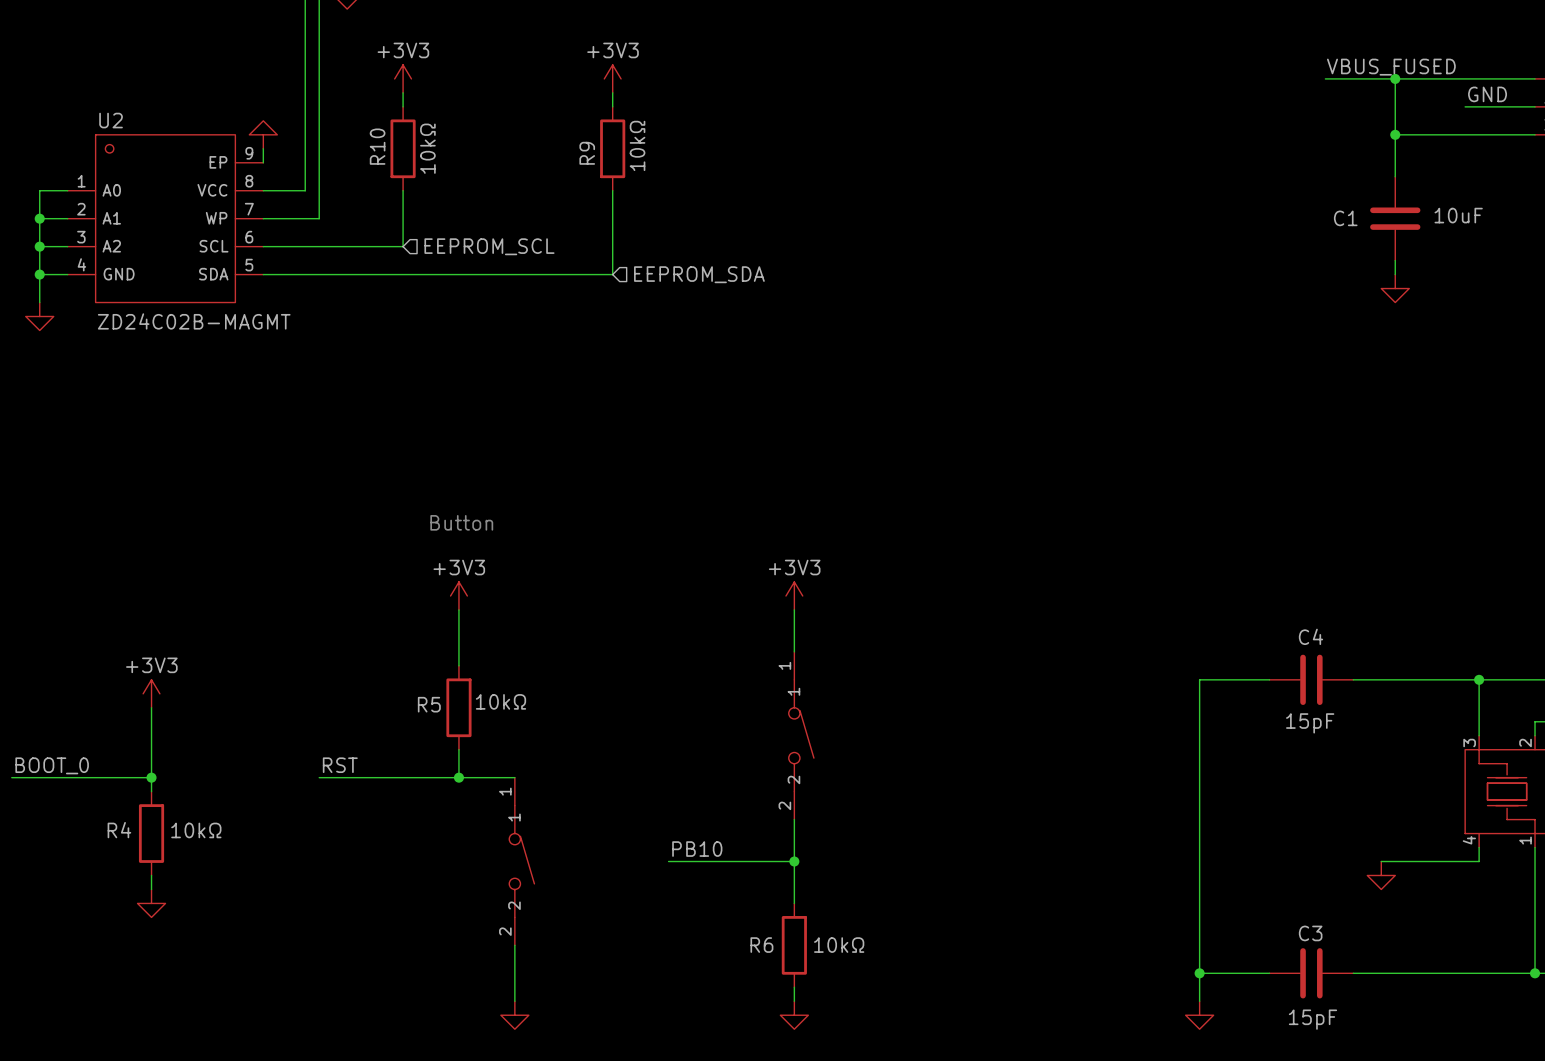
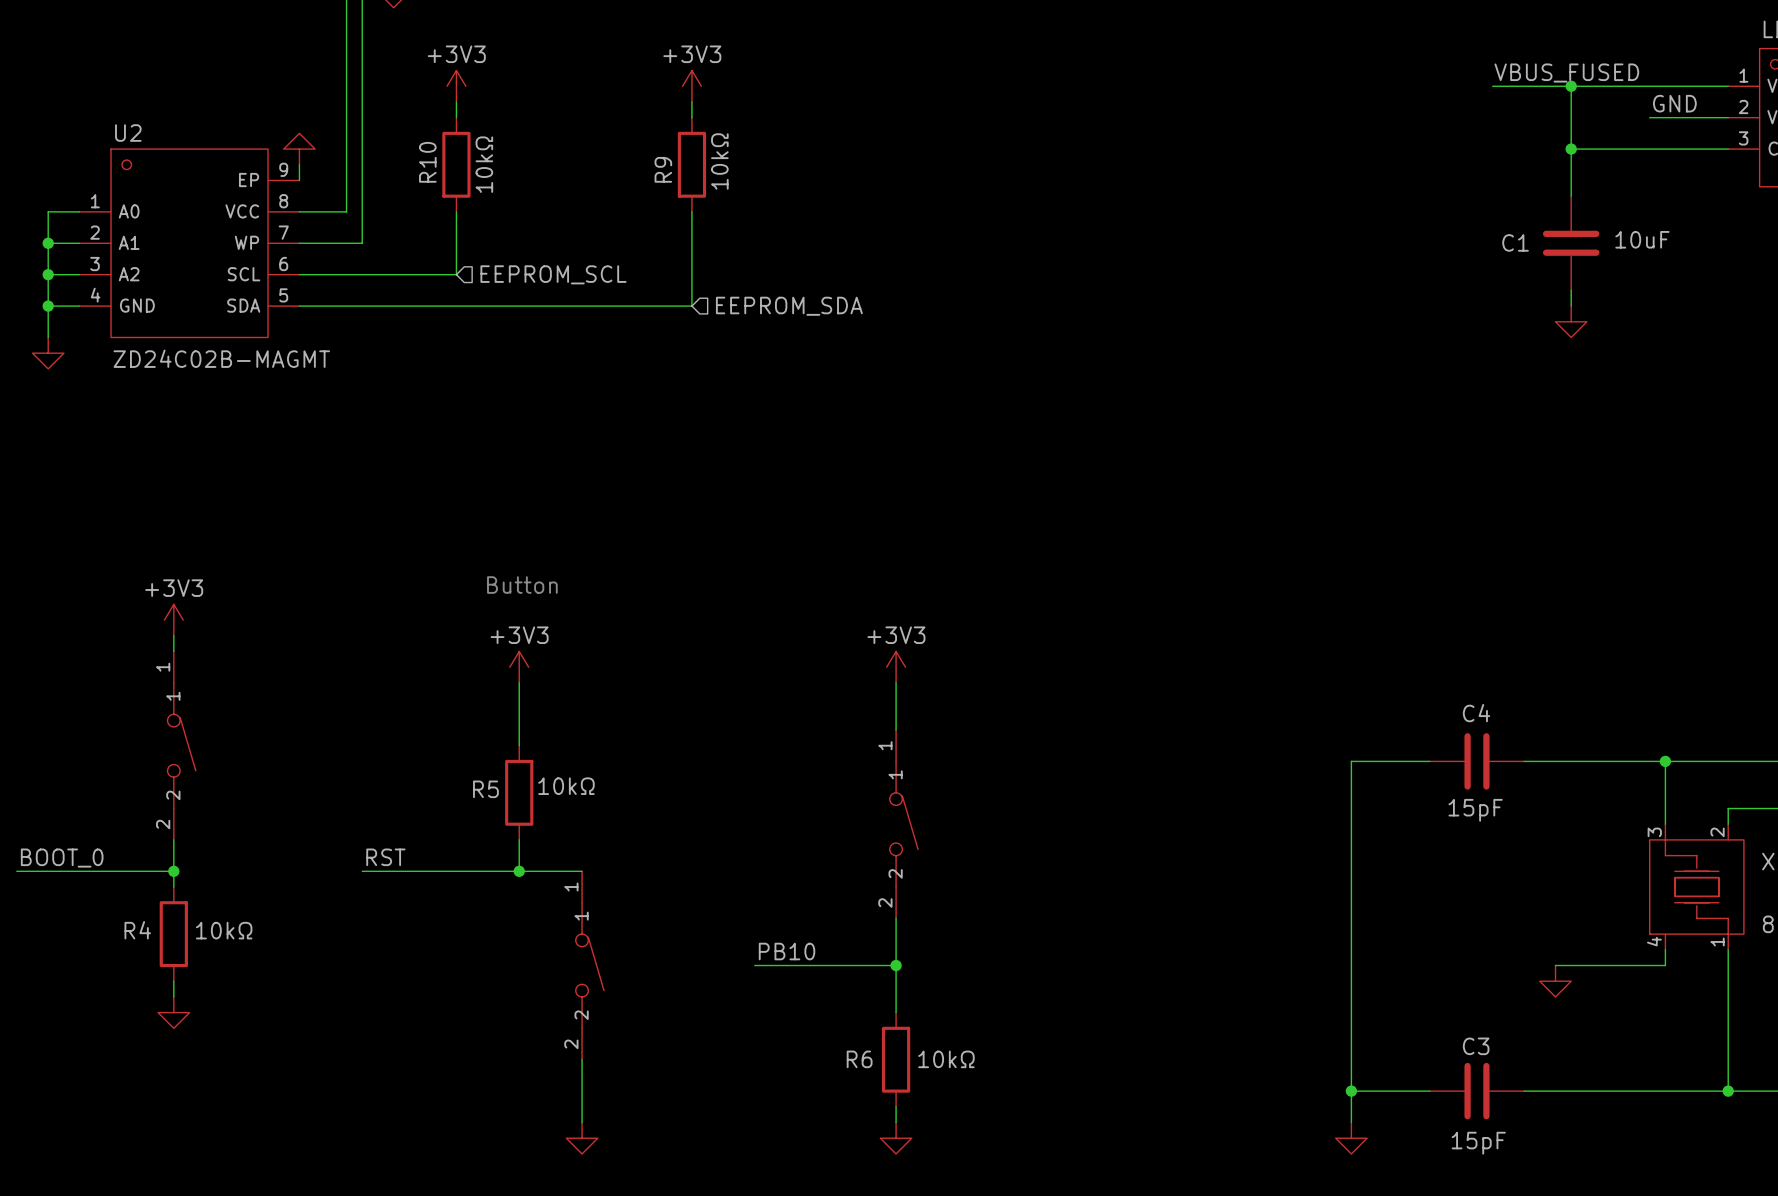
wire: none -> (173, 635) (173, 651)
part: none -> (181, 745)
power symbol position: +3V3 (151, 693) -> +3V3 (173, 620)

